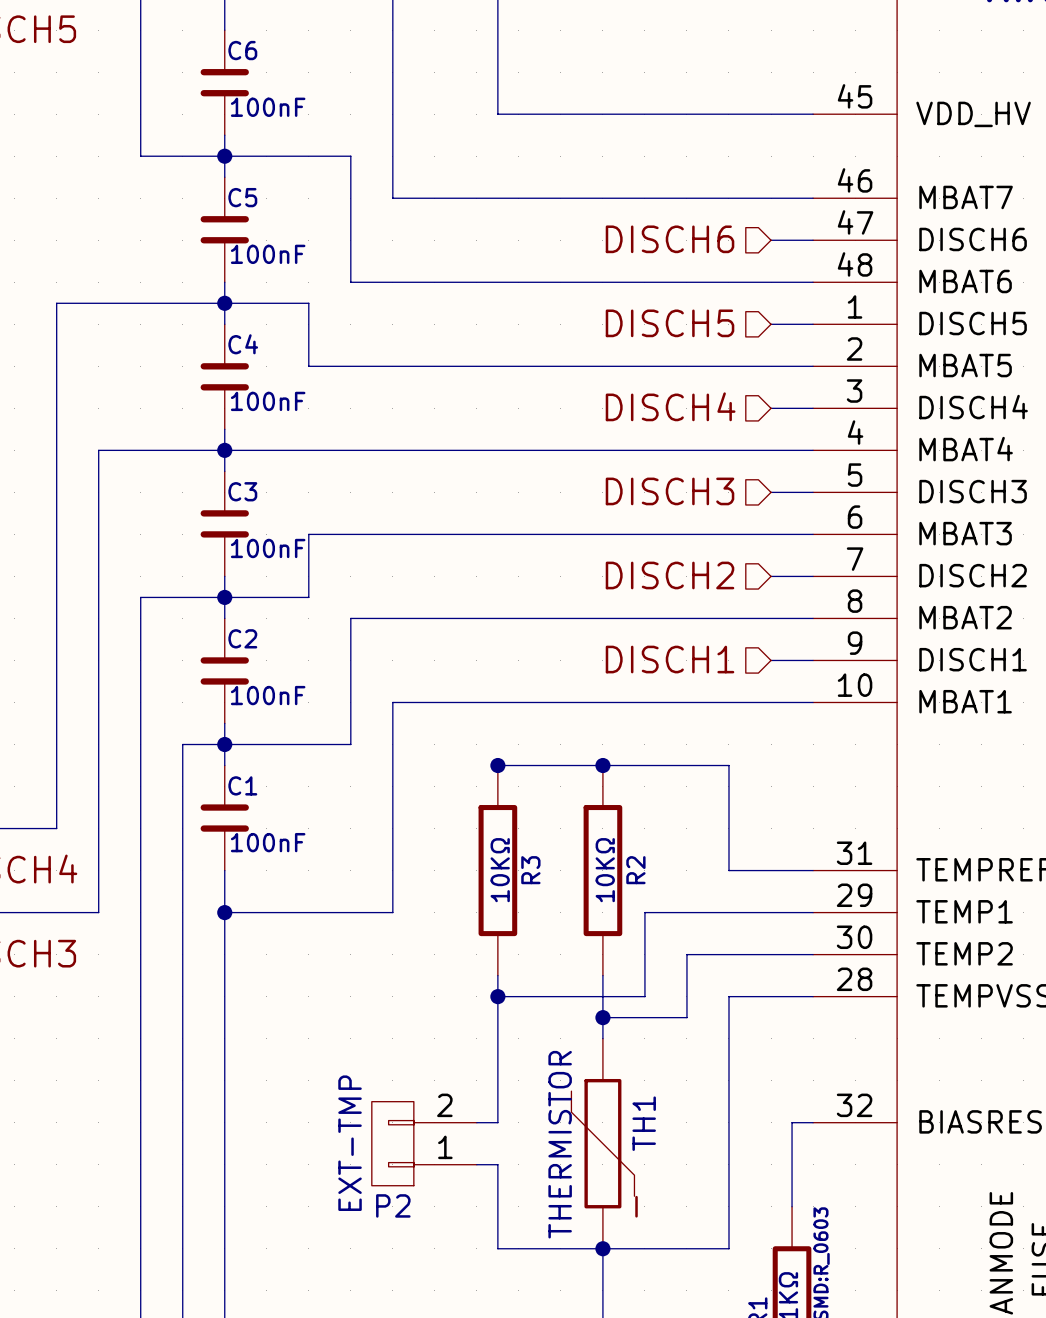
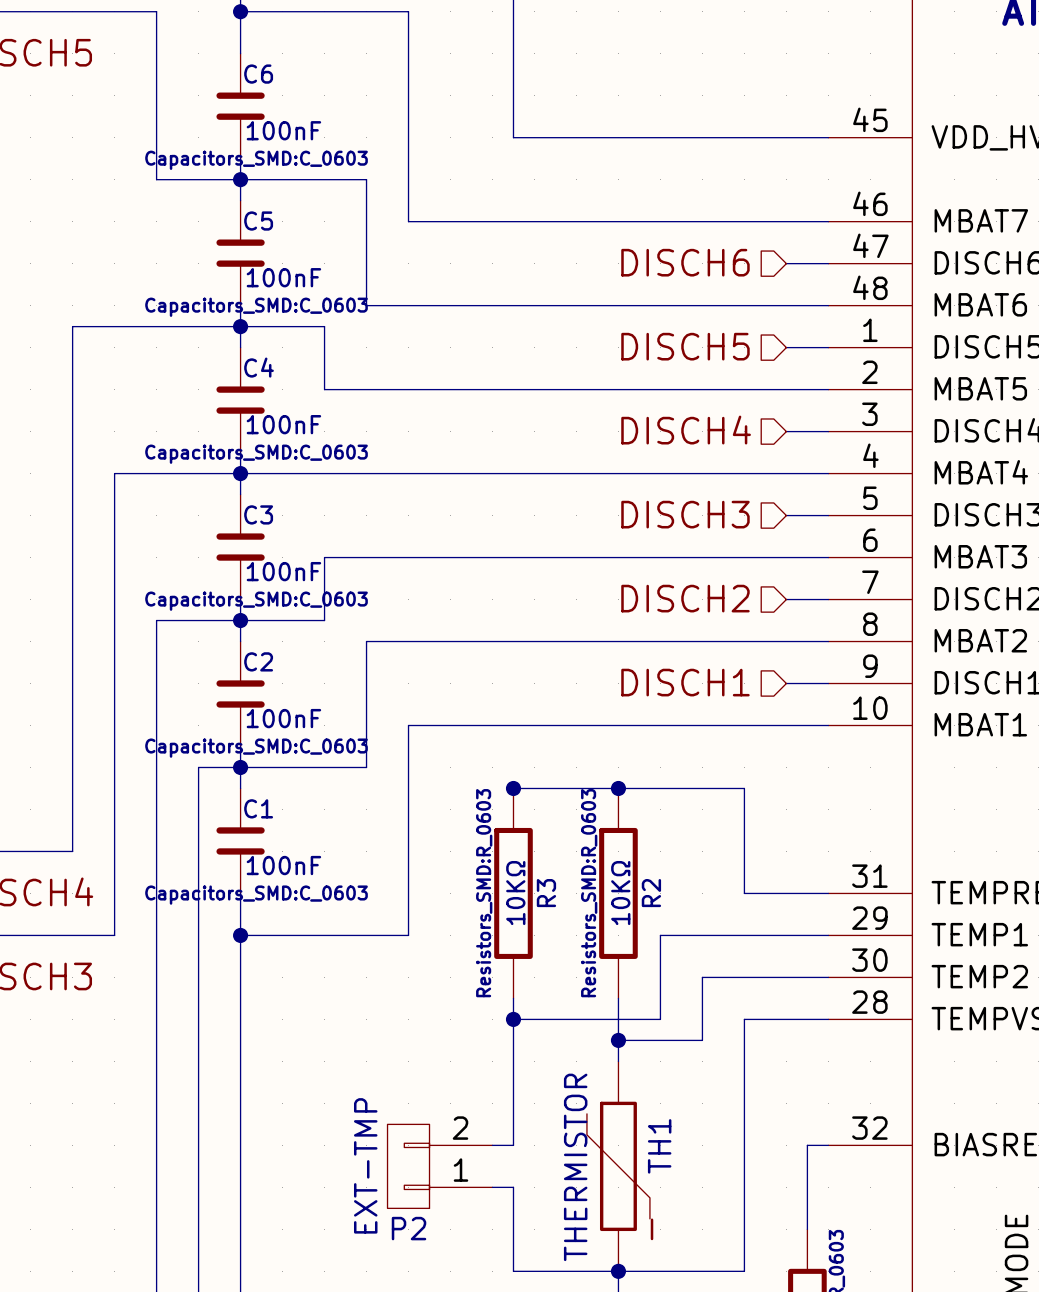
C6 text: none -> Capacitors_SMD:C_0603 (256, 160)
C5 text: none -> Capacitors_SMD:C_0603 (256, 307)
C4 text: none -> Capacitors_SMD:C_0603 (256, 454)
C3 text: none -> Capacitors_SMD:C_0603 (256, 601)
C2 text: none -> Capacitors_SMD:C_0603 (256, 748)
R3 text: none -> Resistors_SMD:R_0603 (484, 893)
R2 text: none -> Resistors_SMD:R_0603 (589, 893)
C1 text: none -> Capacitors_SMD:C_0603 (256, 895)

